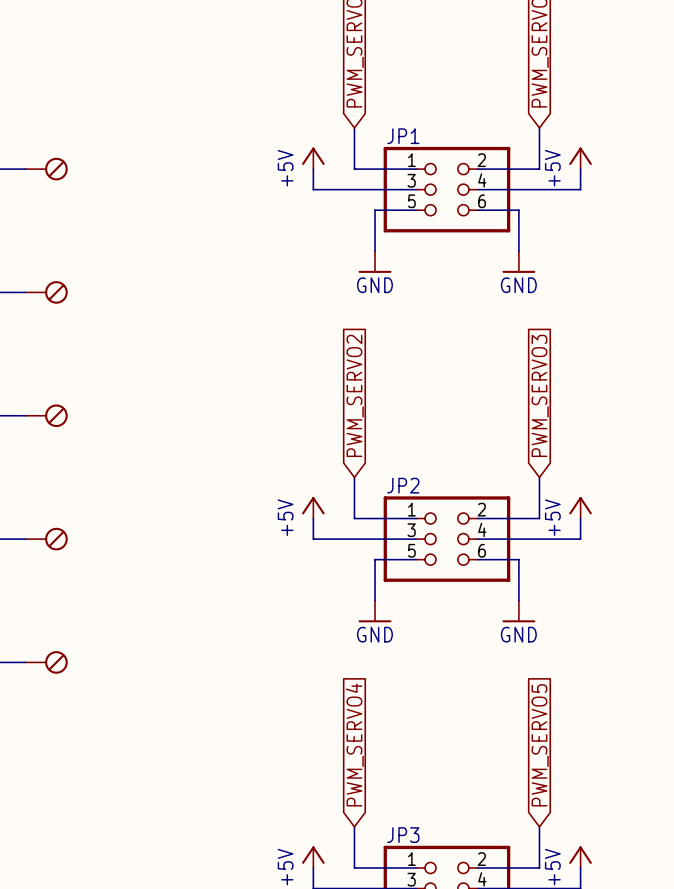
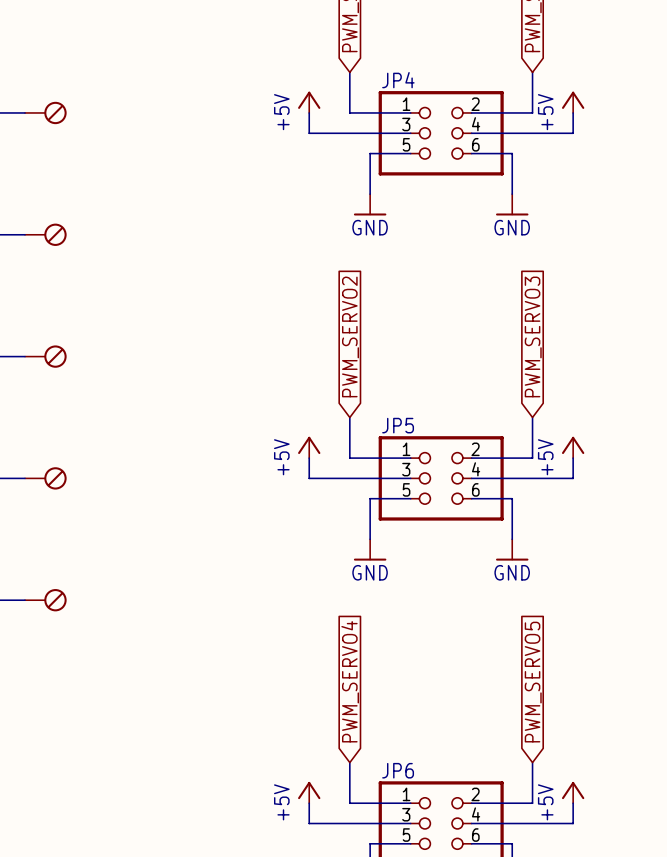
JP1 name: JP1 (403, 136) -> JP4 (398, 80)
JP2 name: JP2 (403, 485) -> JP5 (398, 425)
JP3 name: JP3 (403, 835) -> JP6 (398, 770)

